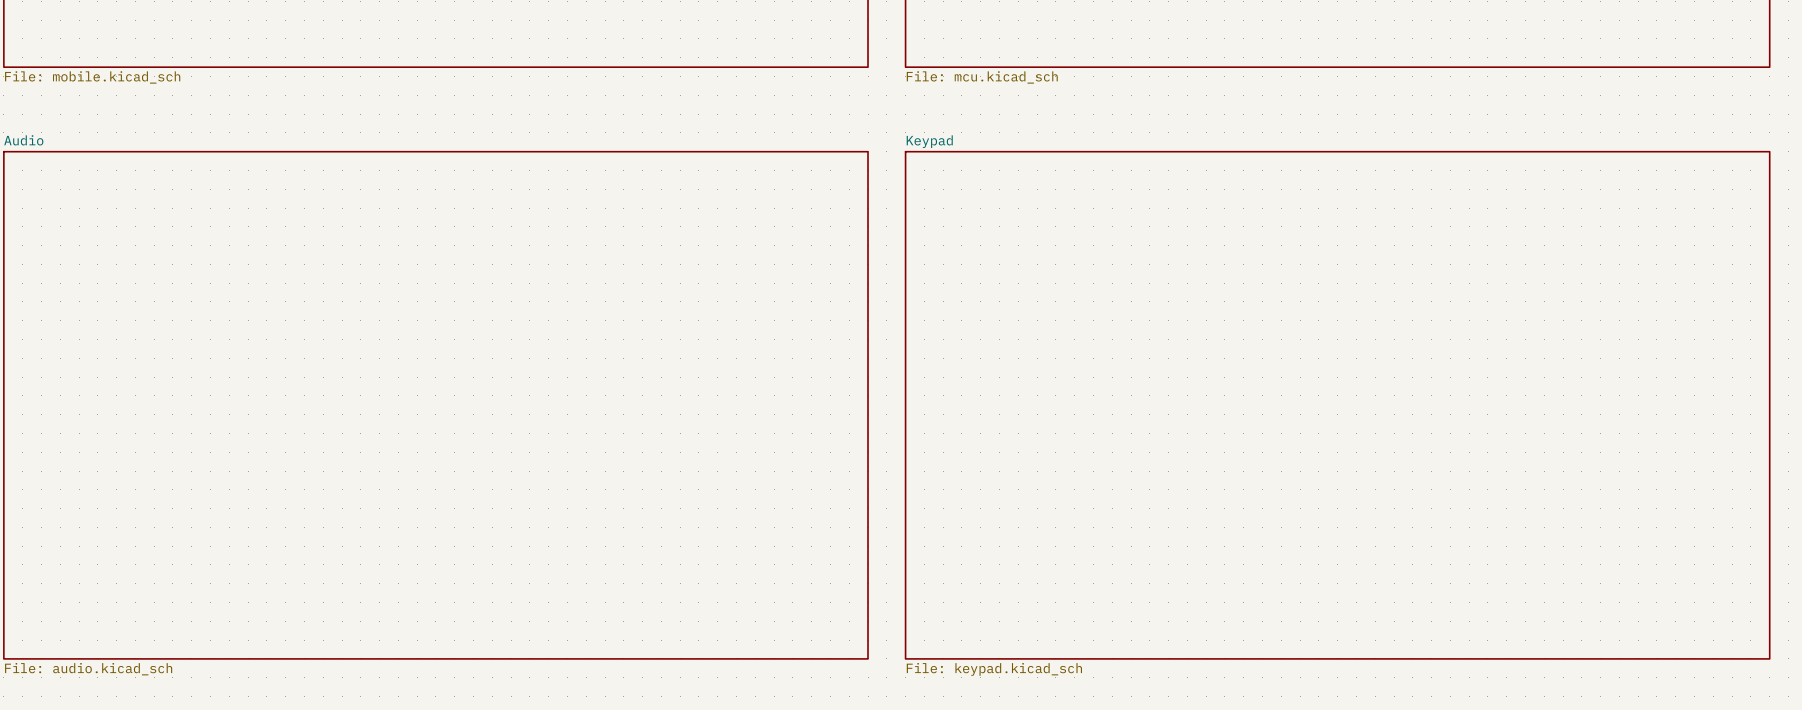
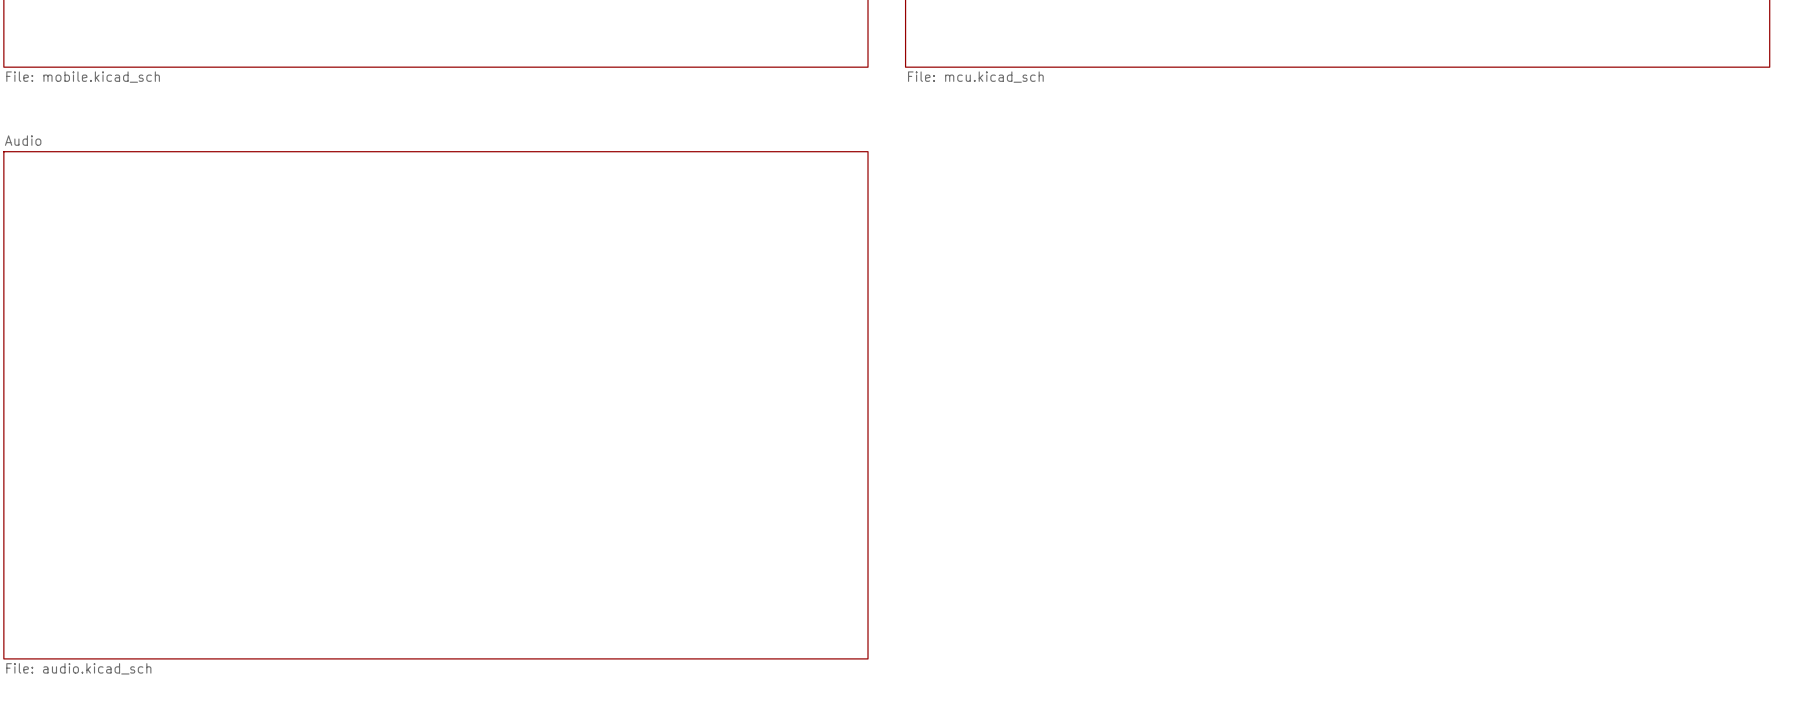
sheet Keypad: File: keypad.kicad_sch (1337, 405) -> none

